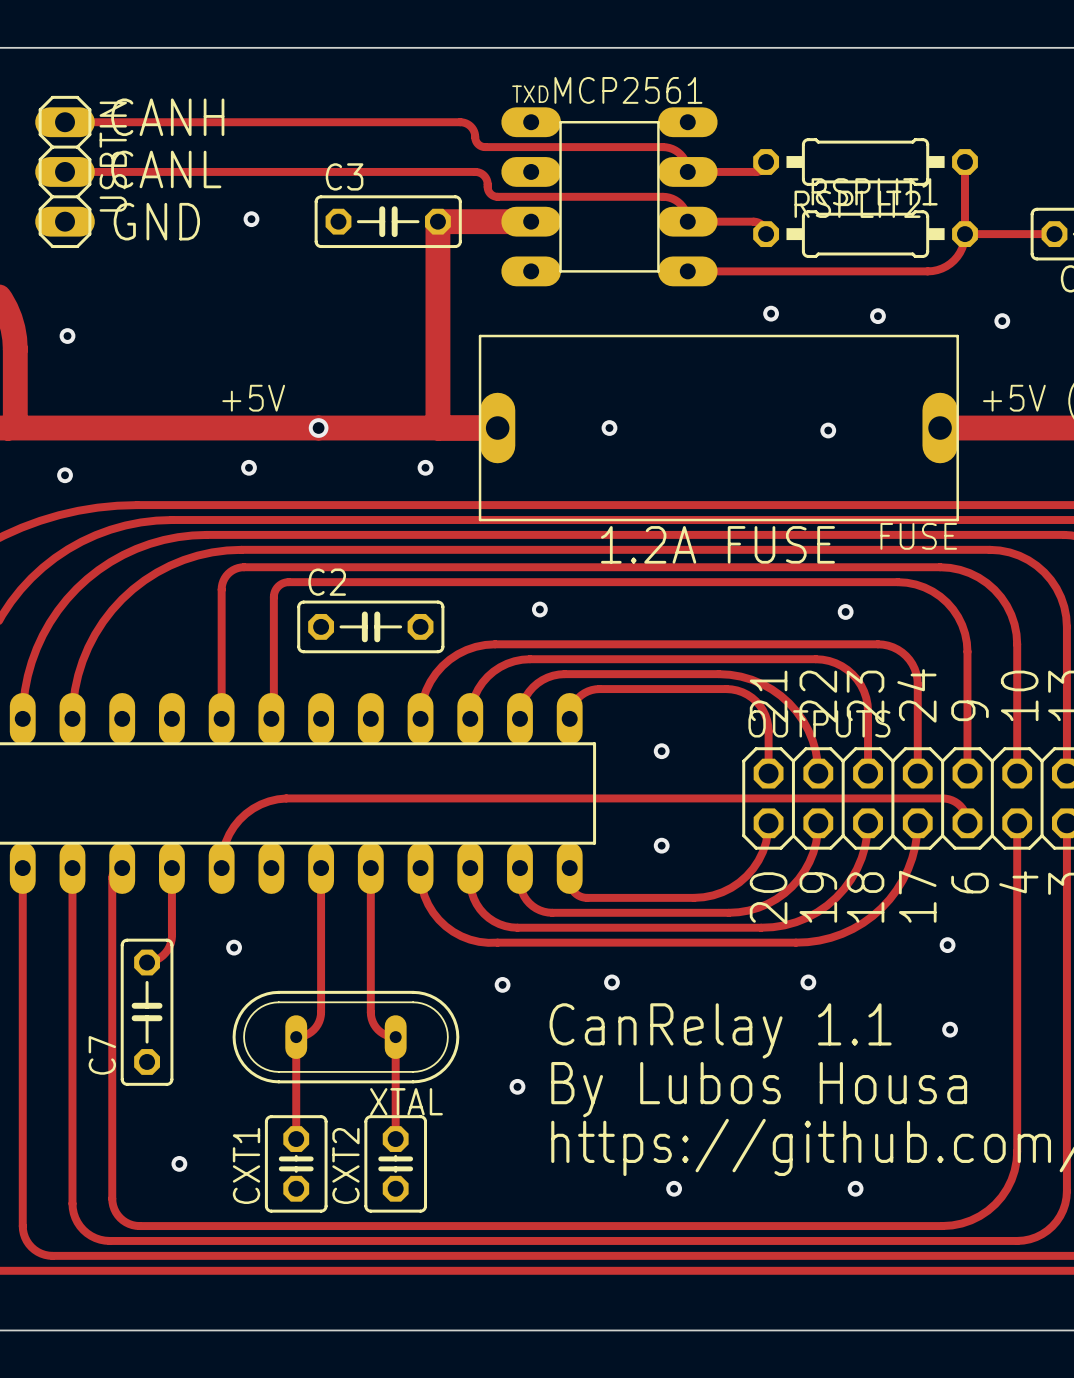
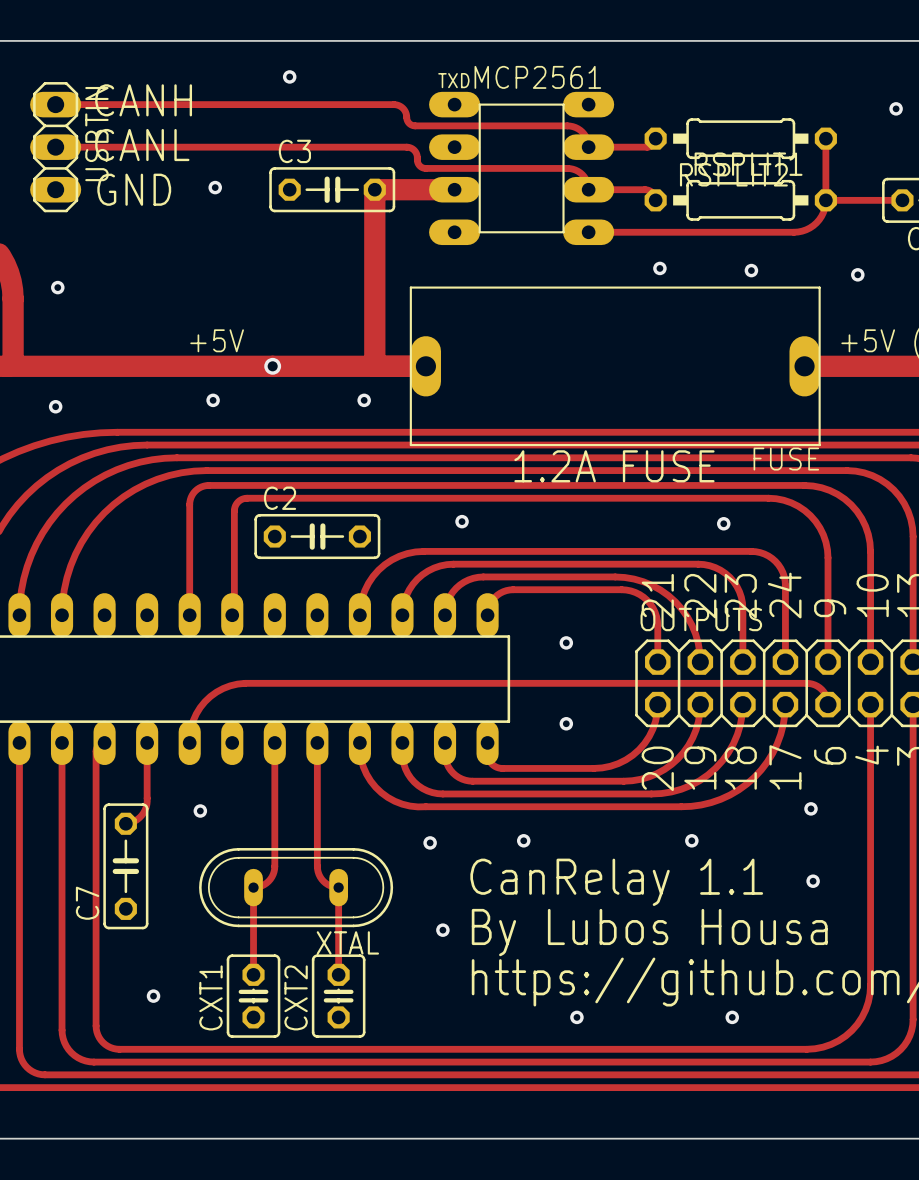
via: none -> (289, 76)
via: none -> (896, 108)
via: (609, 428) -> none
via: (828, 430) -> none

